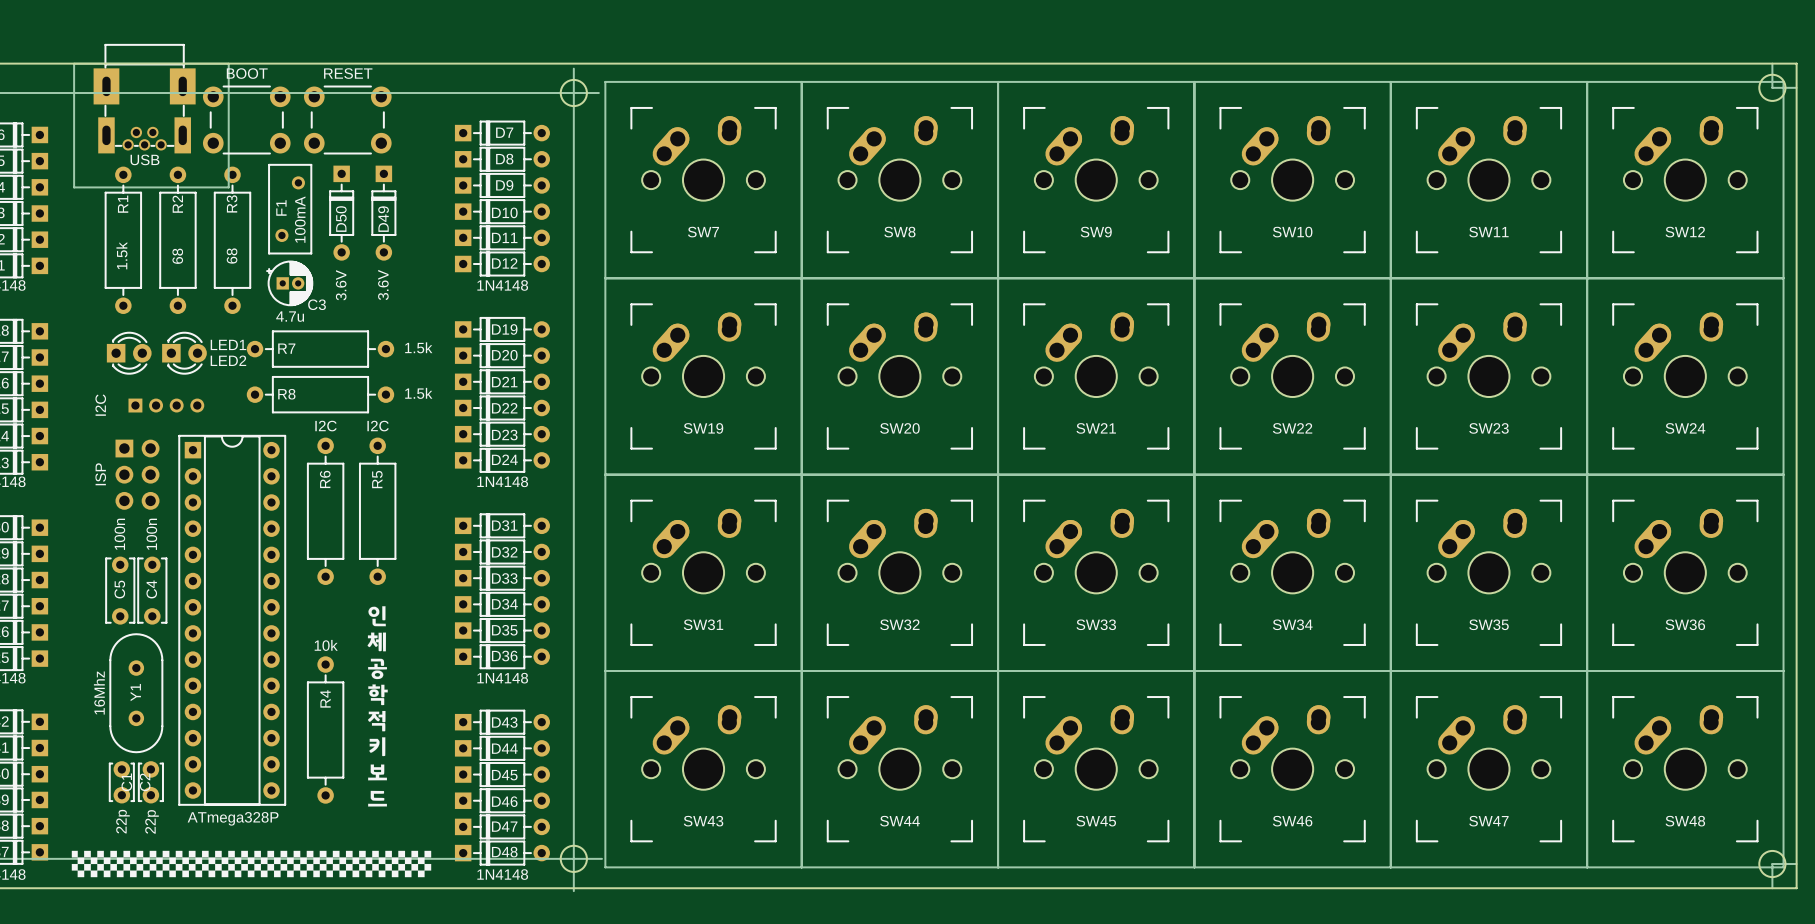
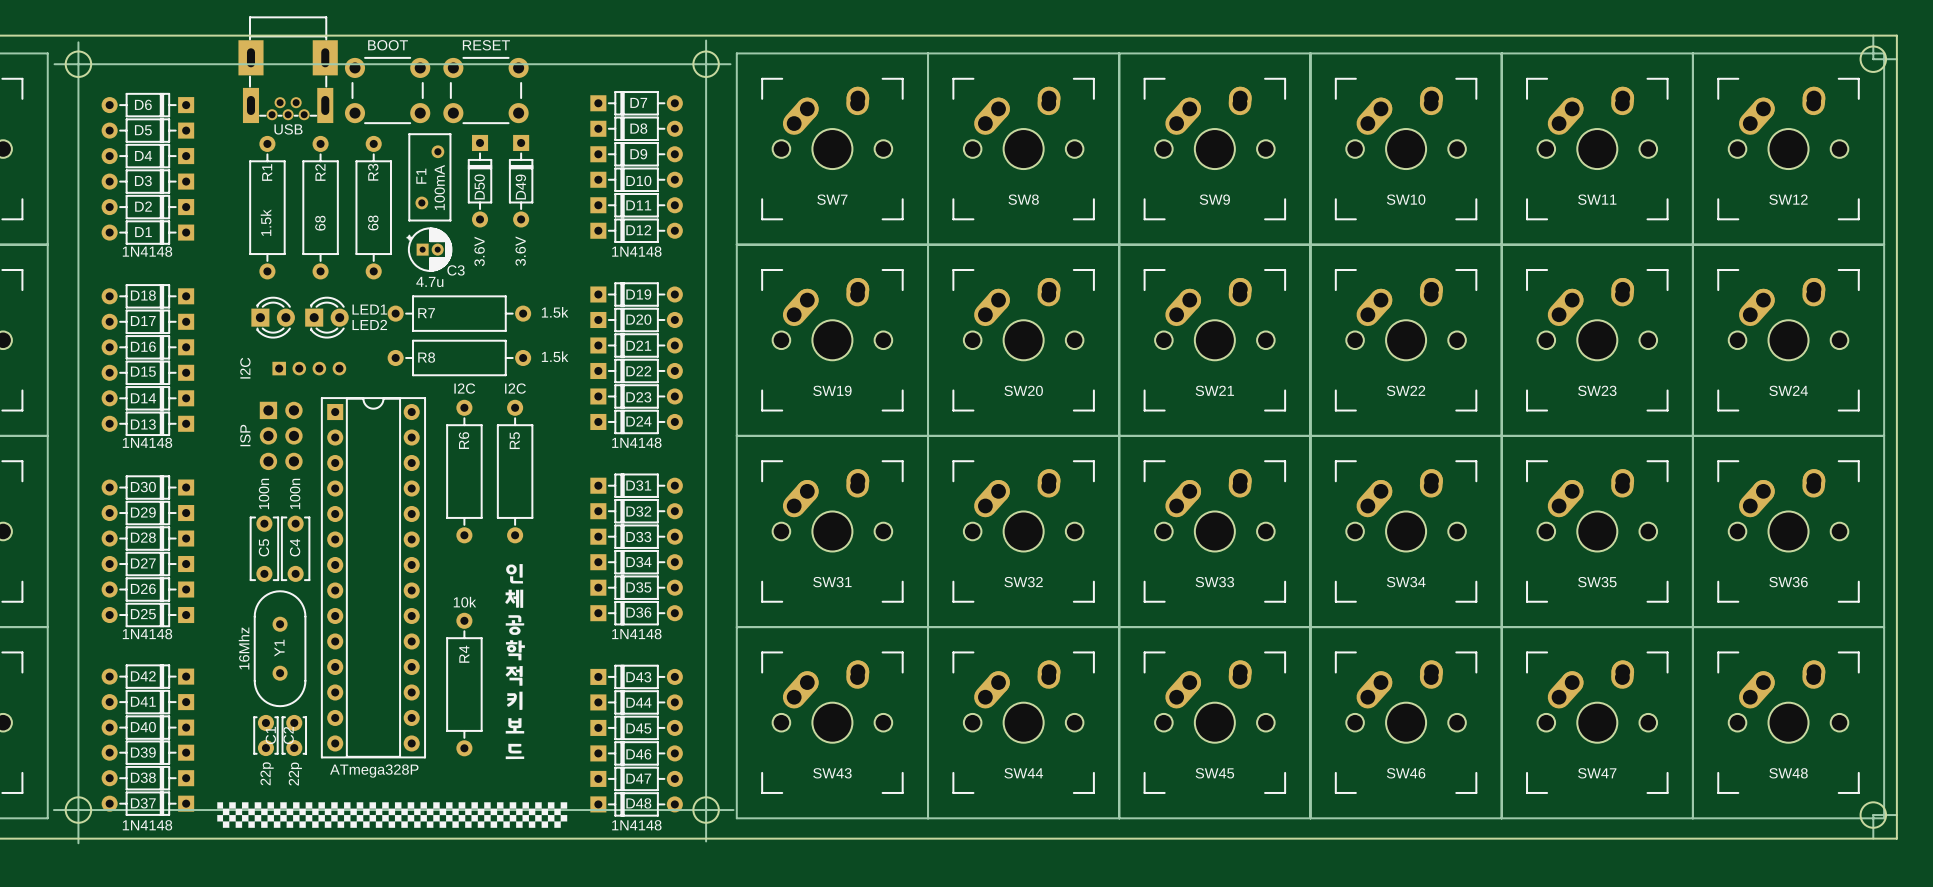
line: (74, 63) (74, 187) (228, 187) (228, 63) (74, 63) -> none

